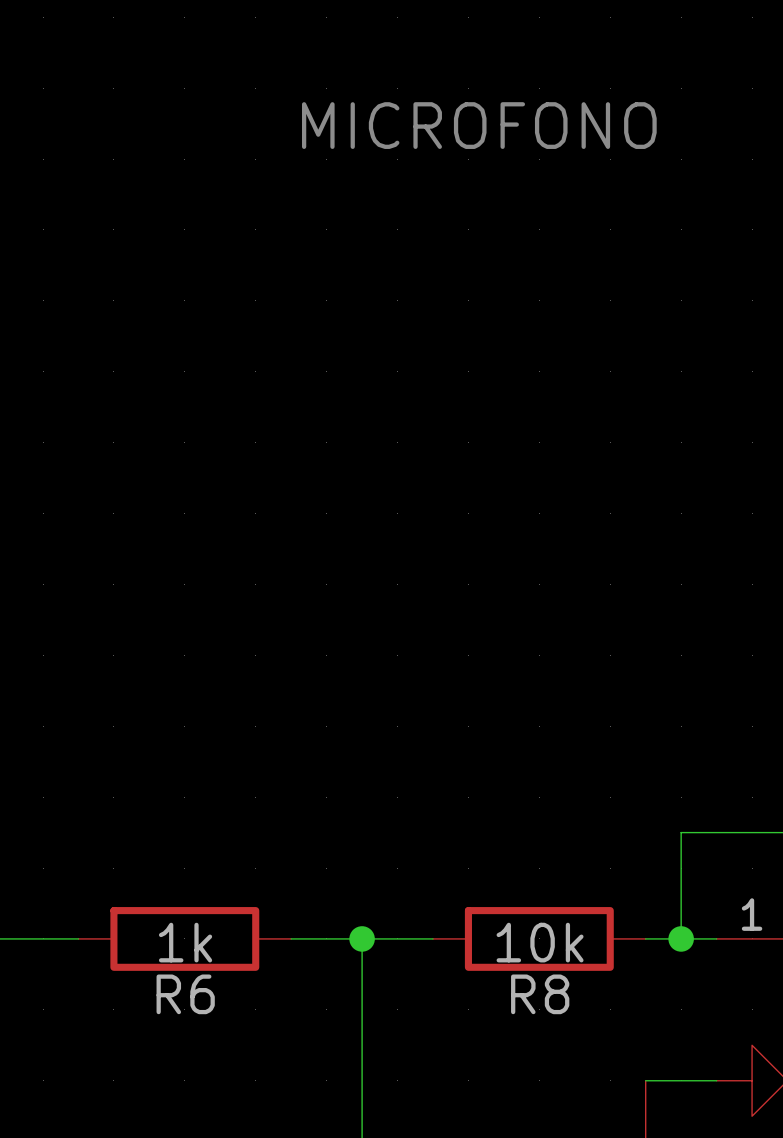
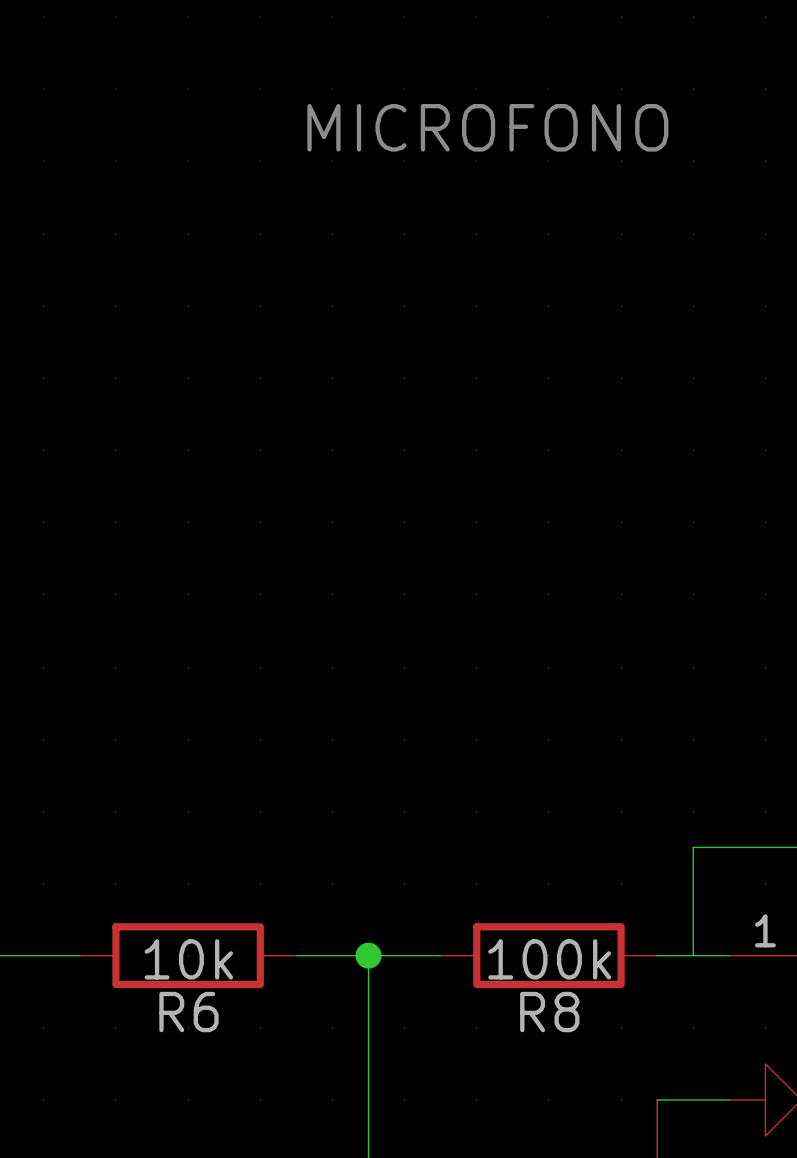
junction: (681, 938) -> none
R6 value: 1k (185, 942) -> 10k (188, 959)
R8 value: 10k (540, 942) -> 100k (549, 959)

